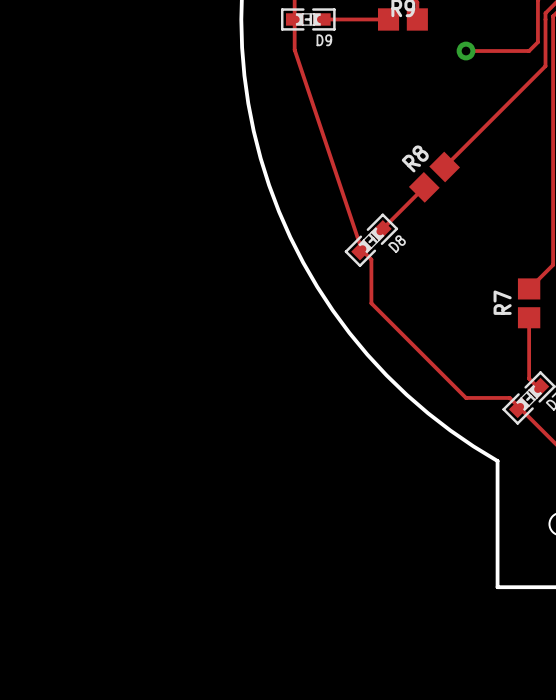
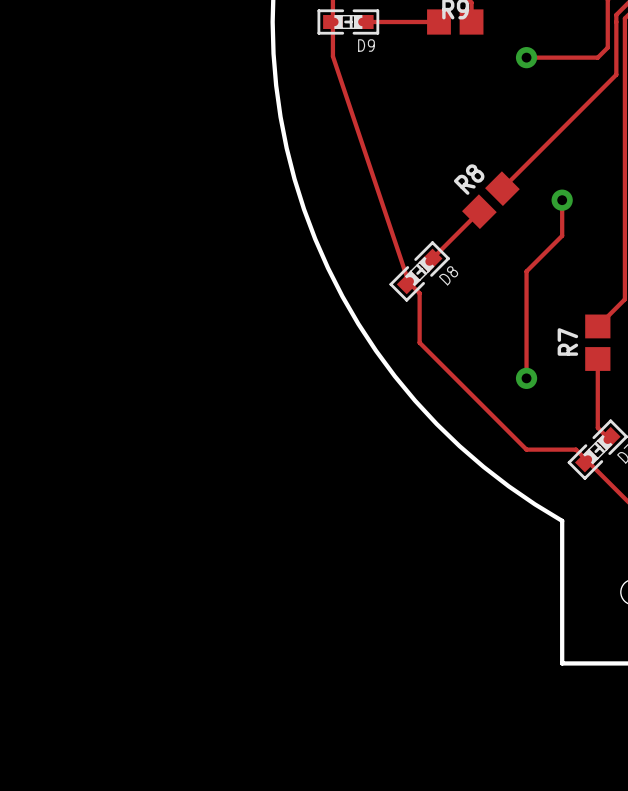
track: none -> (562, 200) (562, 235) (526, 271) (526, 378)
via: none -> (562, 200)
via: none -> (526, 378)

